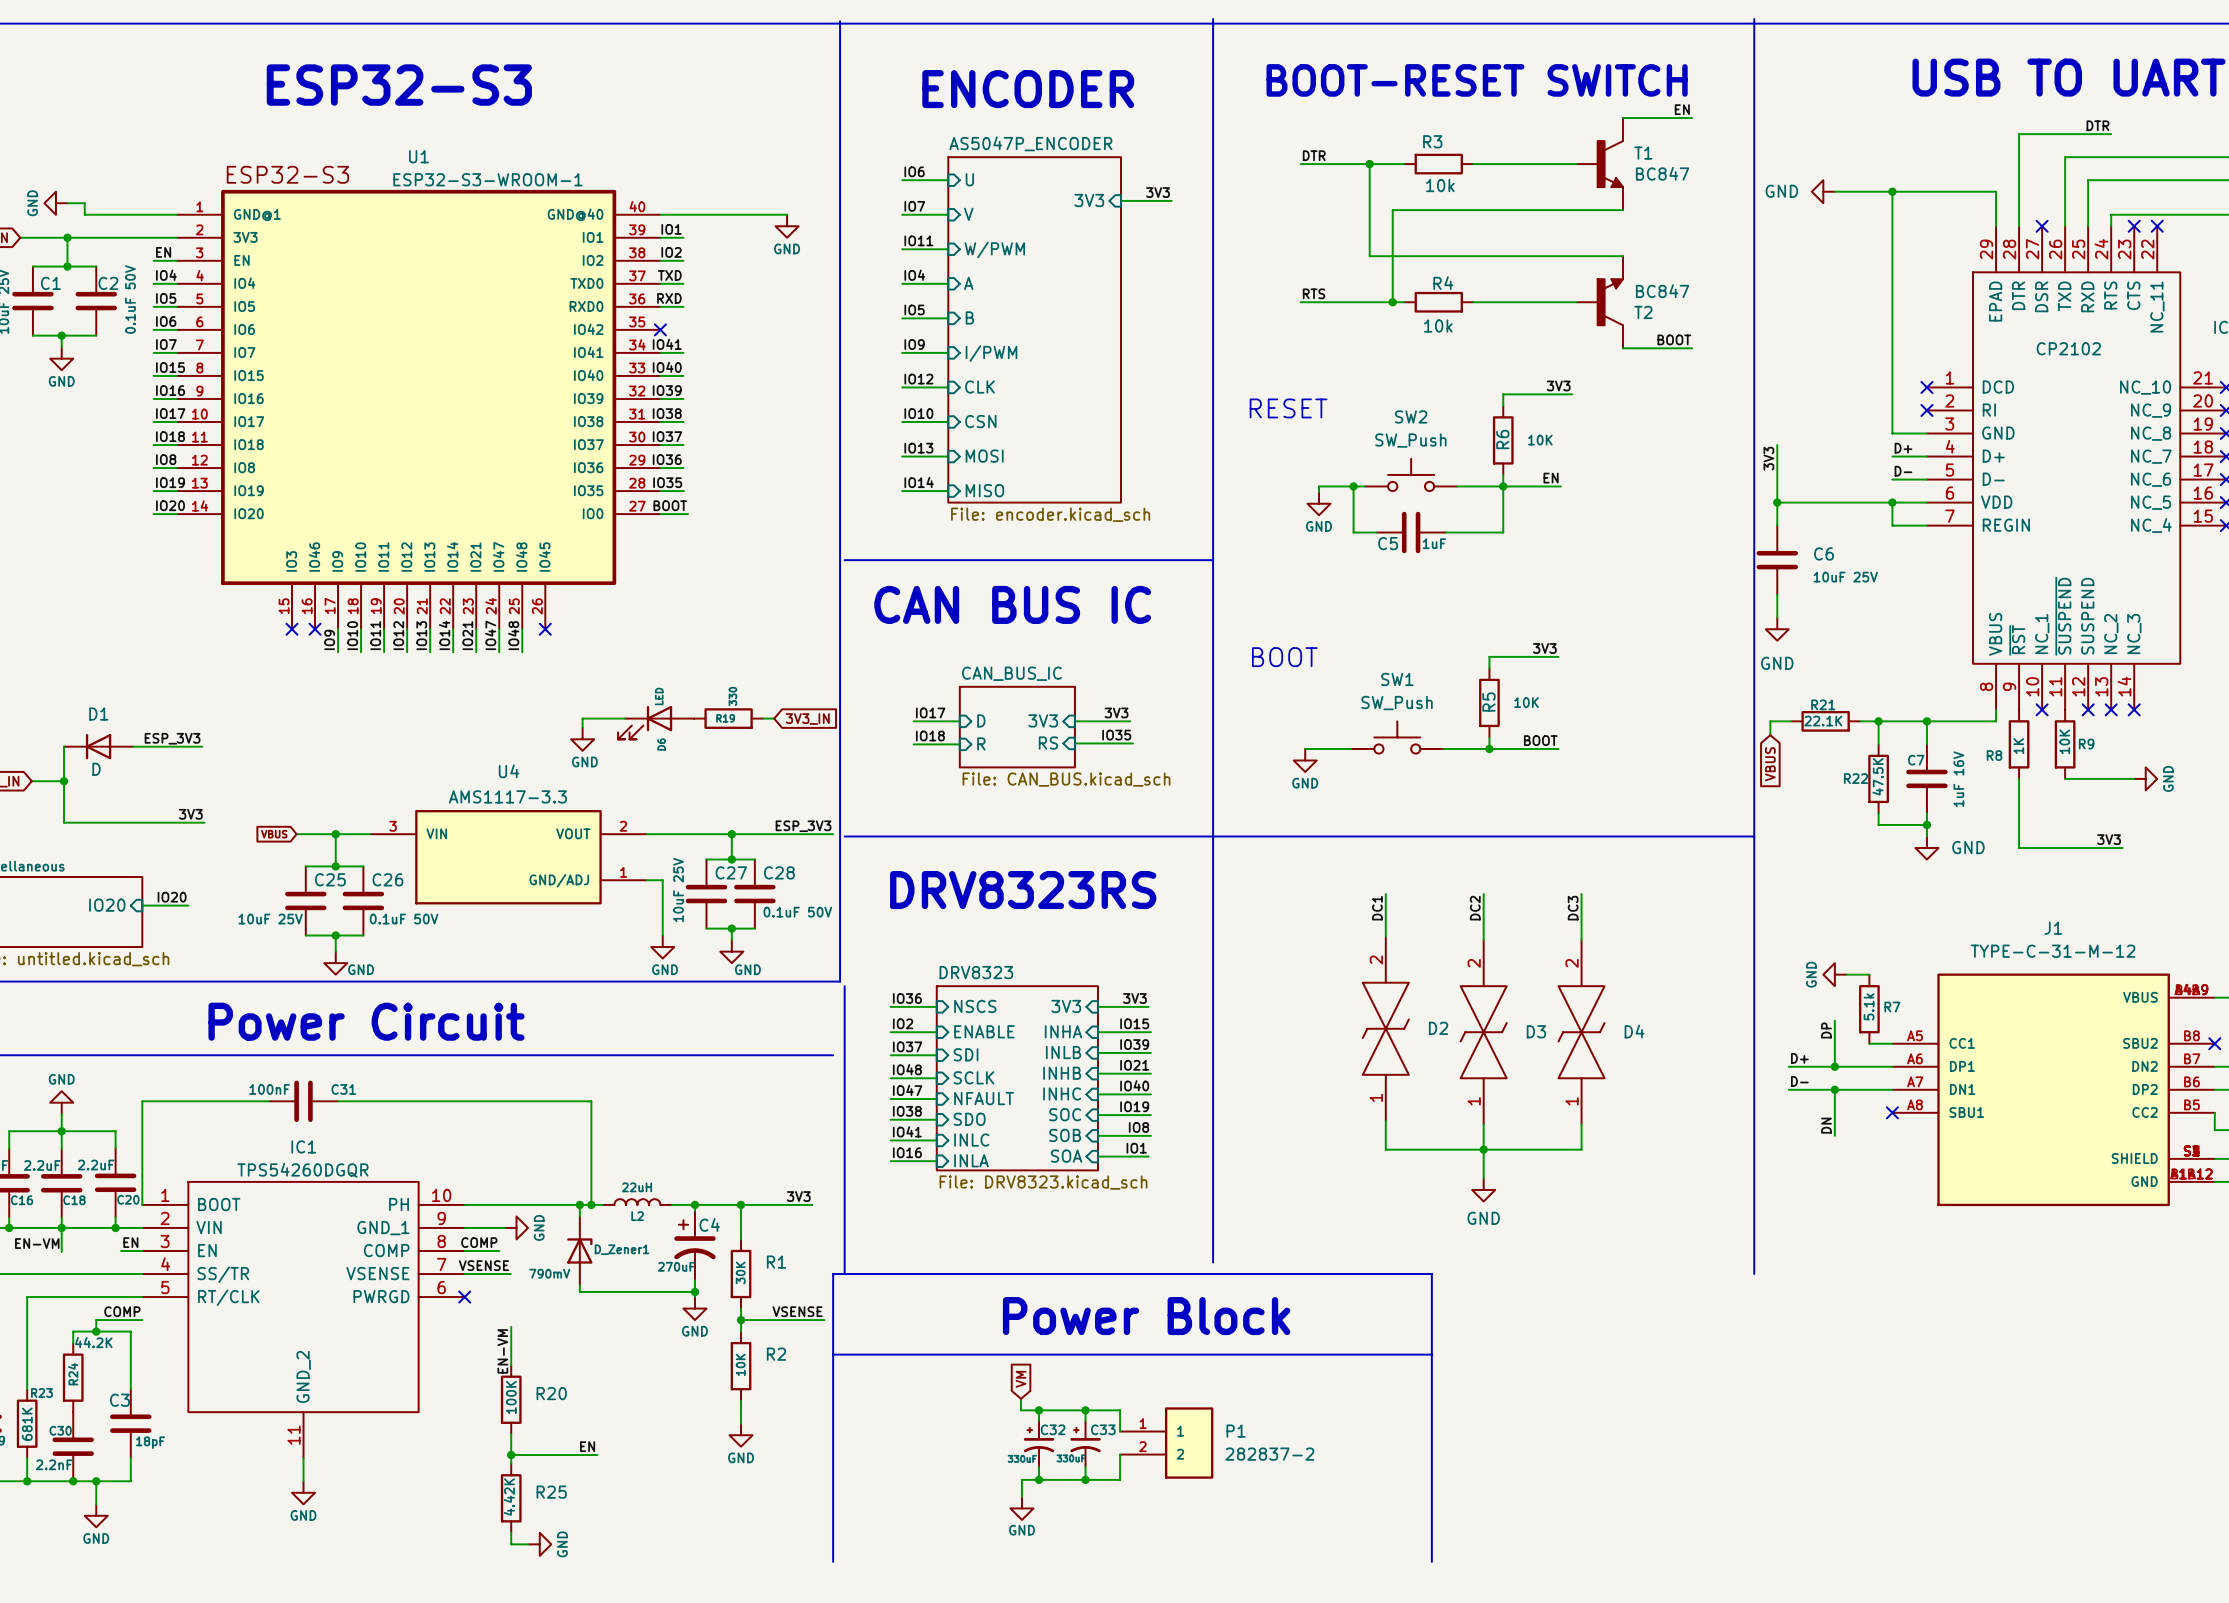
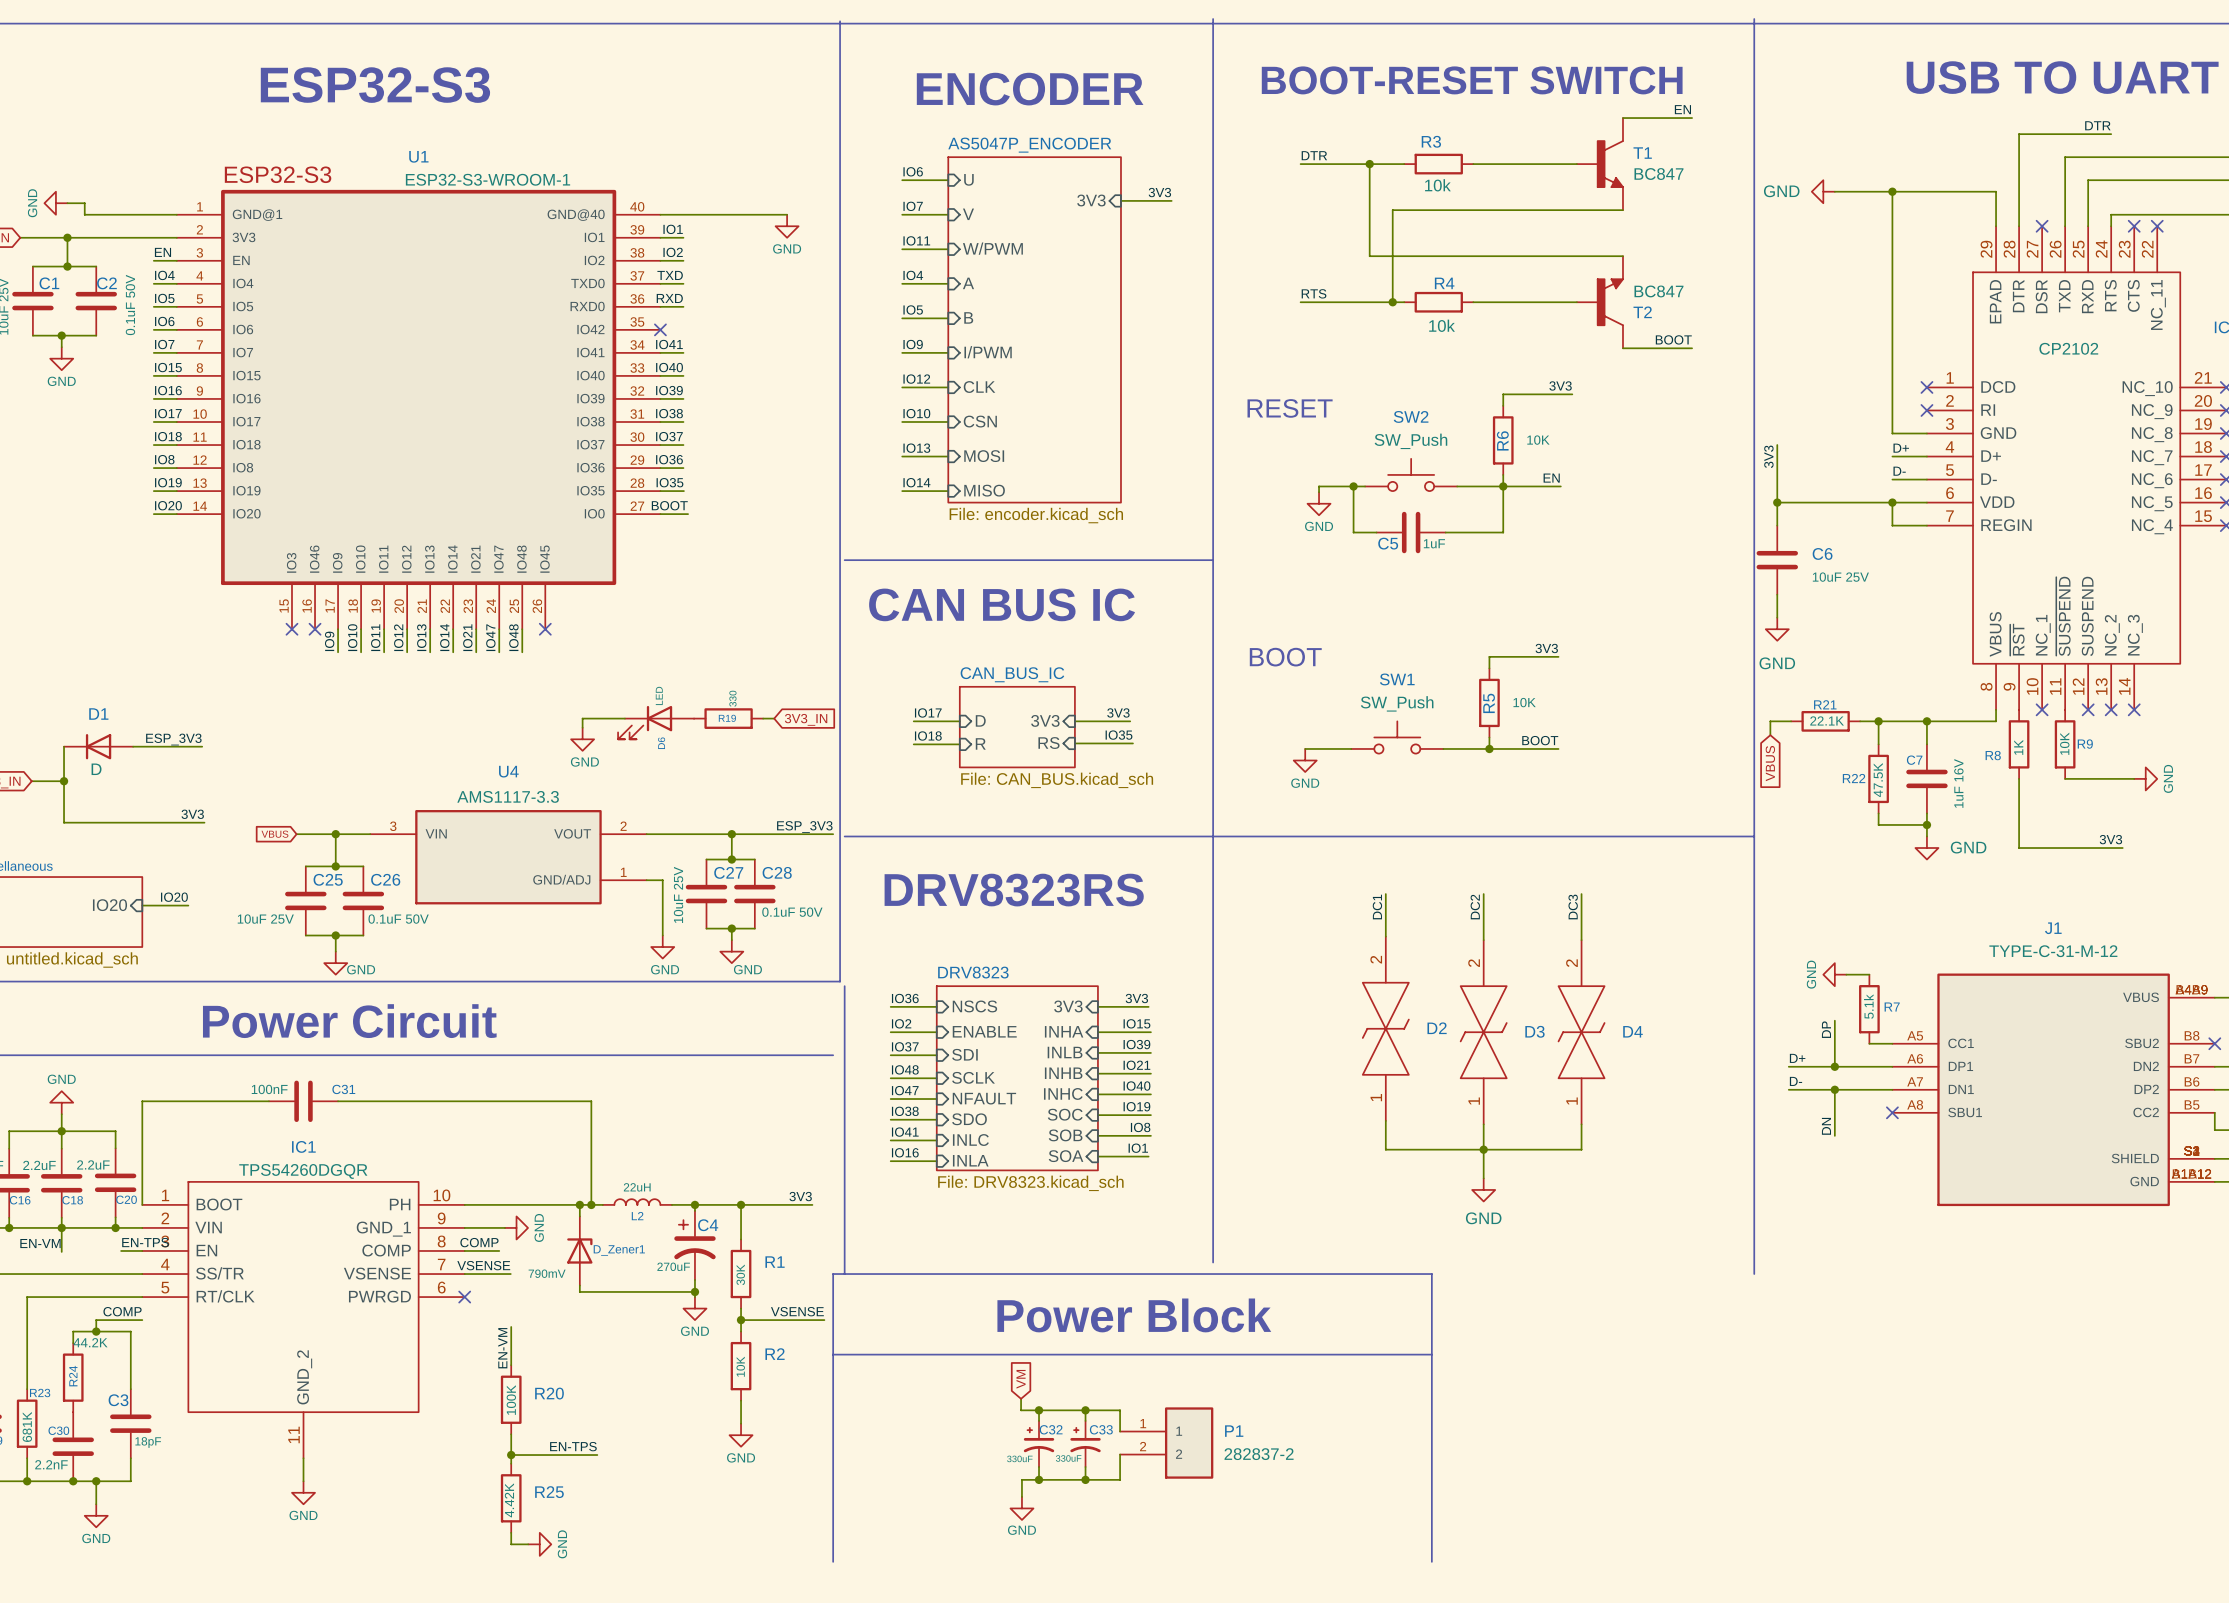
label: EN (130, 1242) -> EN-TPS (145, 1242)
label: EN (587, 1446) -> EN-TPS (573, 1446)

